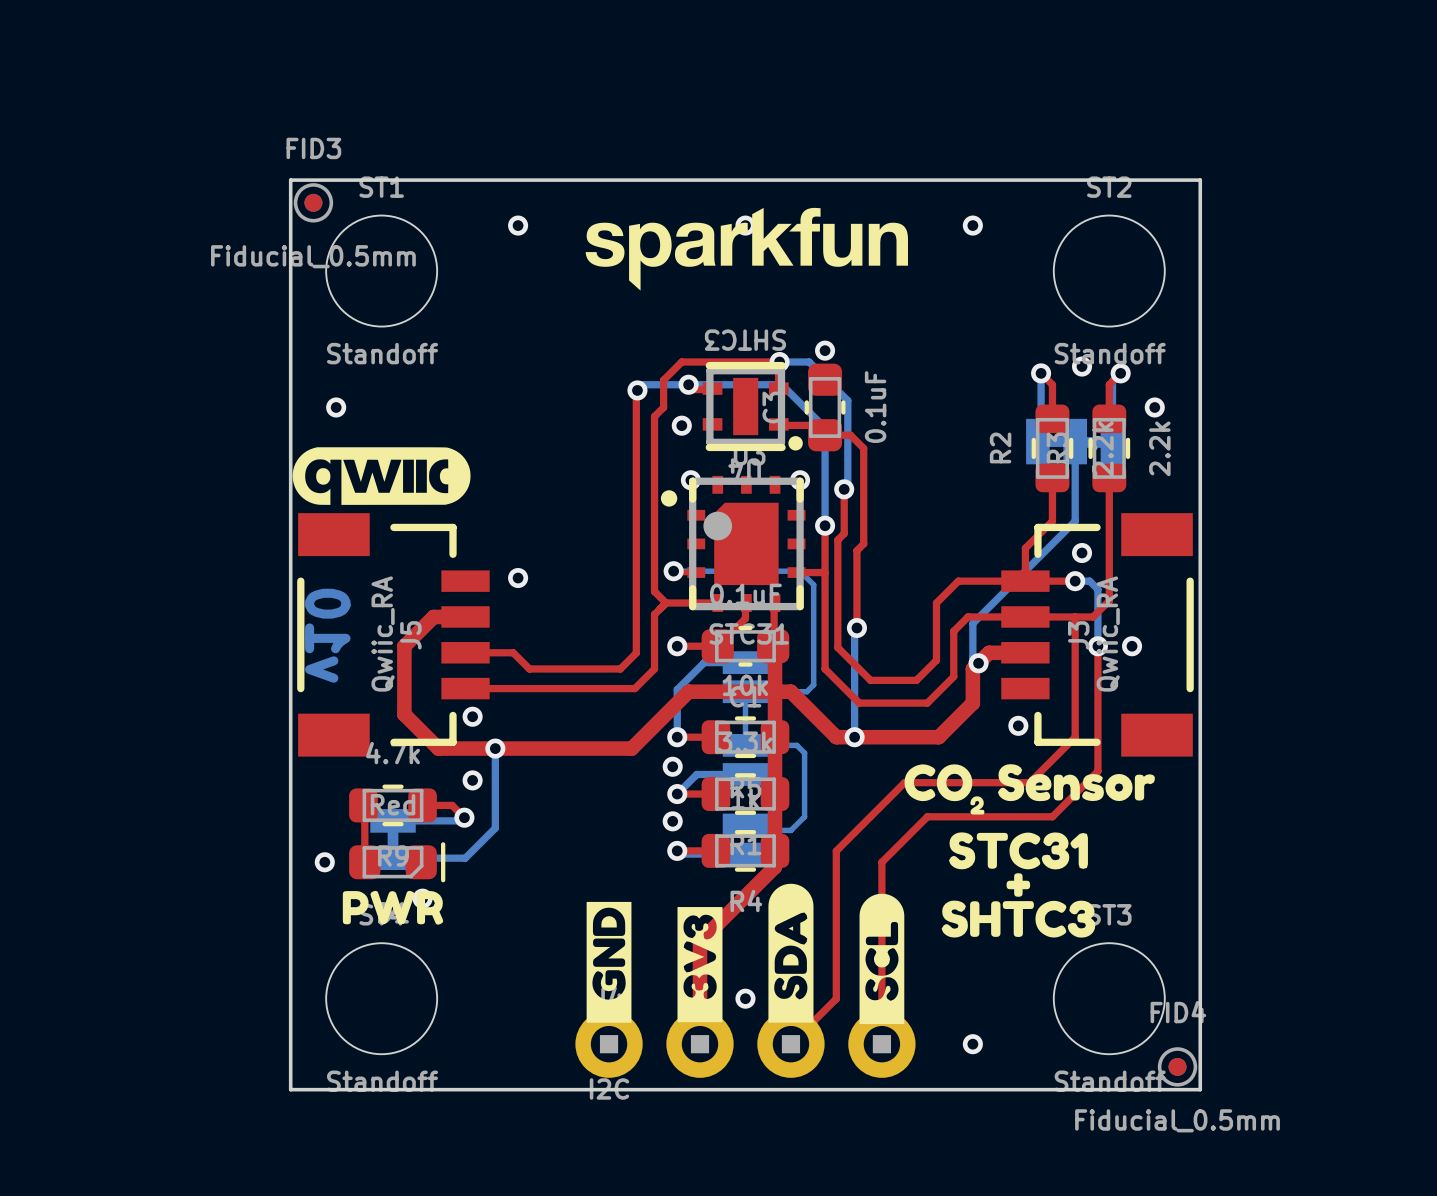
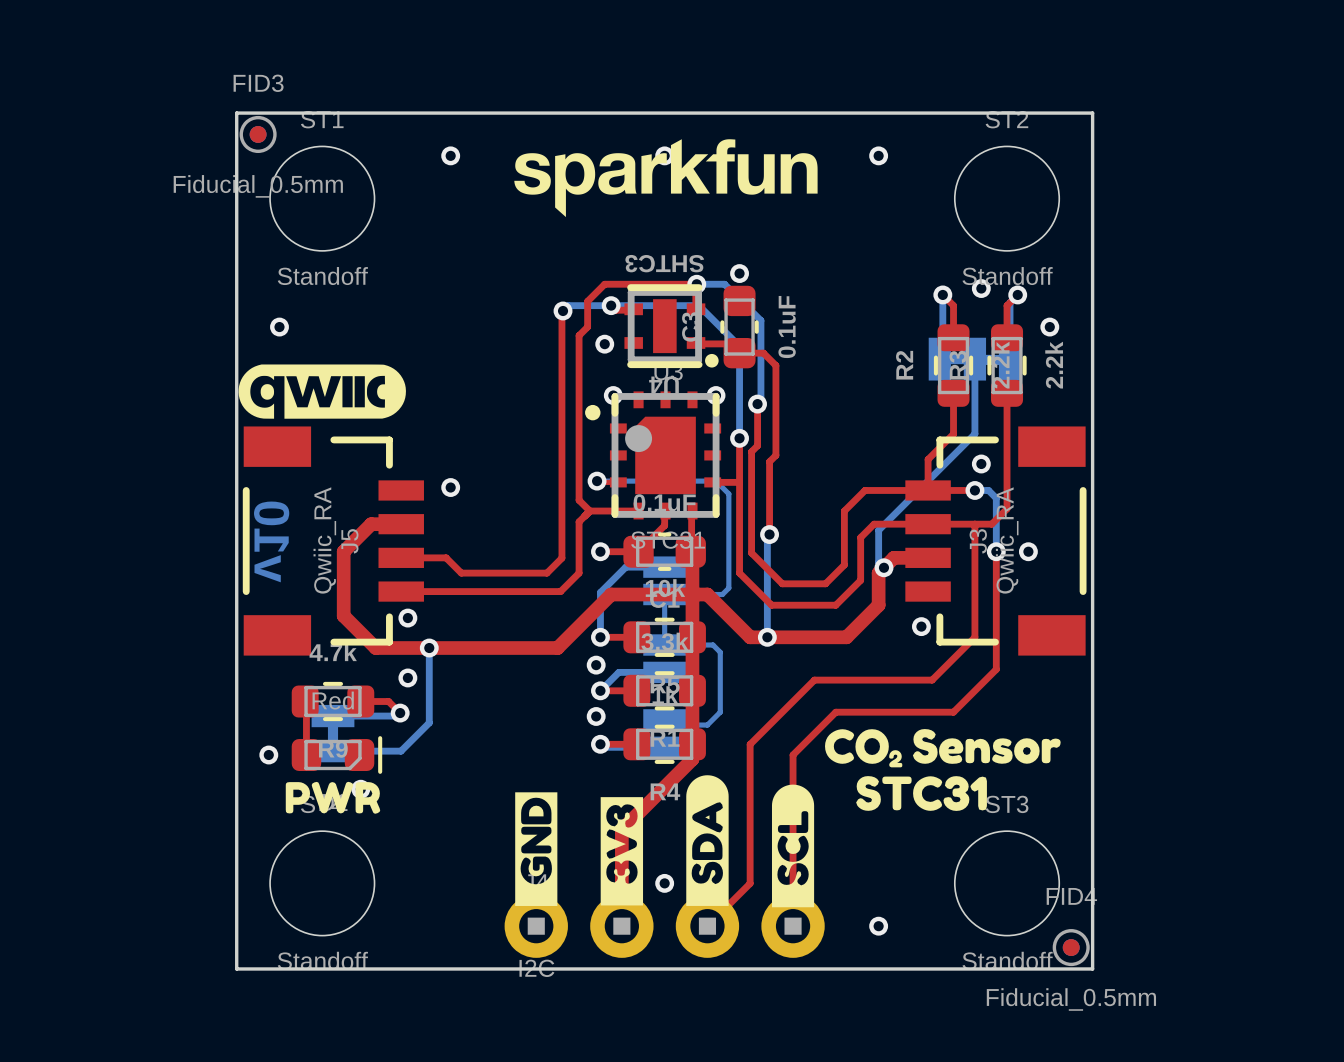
drawing position: (1029, 782) -> (942, 746)
drawing position: (977, 805) -> (895, 758)
drawing position: (1018, 850) -> (921, 793)
drawing: [941, 873, 1096, 938] -> none

